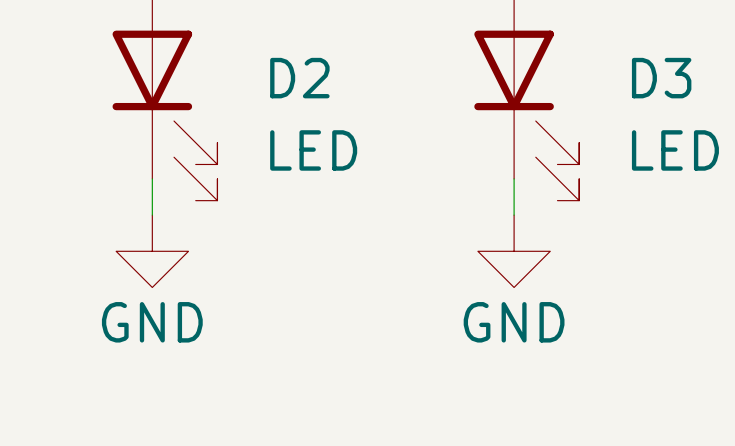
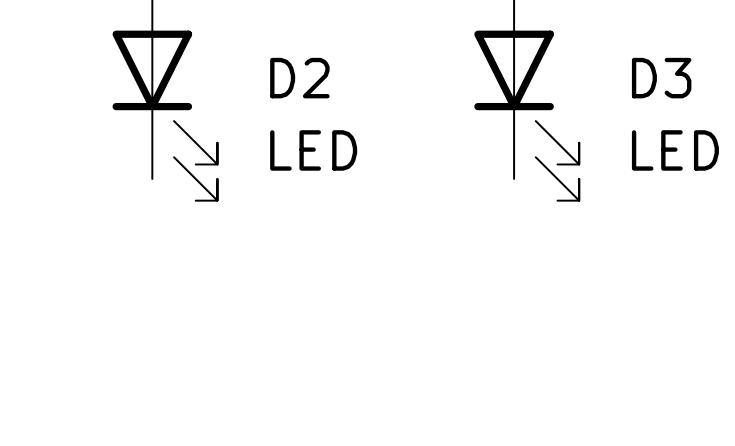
wire: (152, 178) (152, 215) -> none
wire: (514, 178) (514, 215) -> none
power symbol: GND (152, 251) -> none
power symbol: GND (514, 251) -> none

